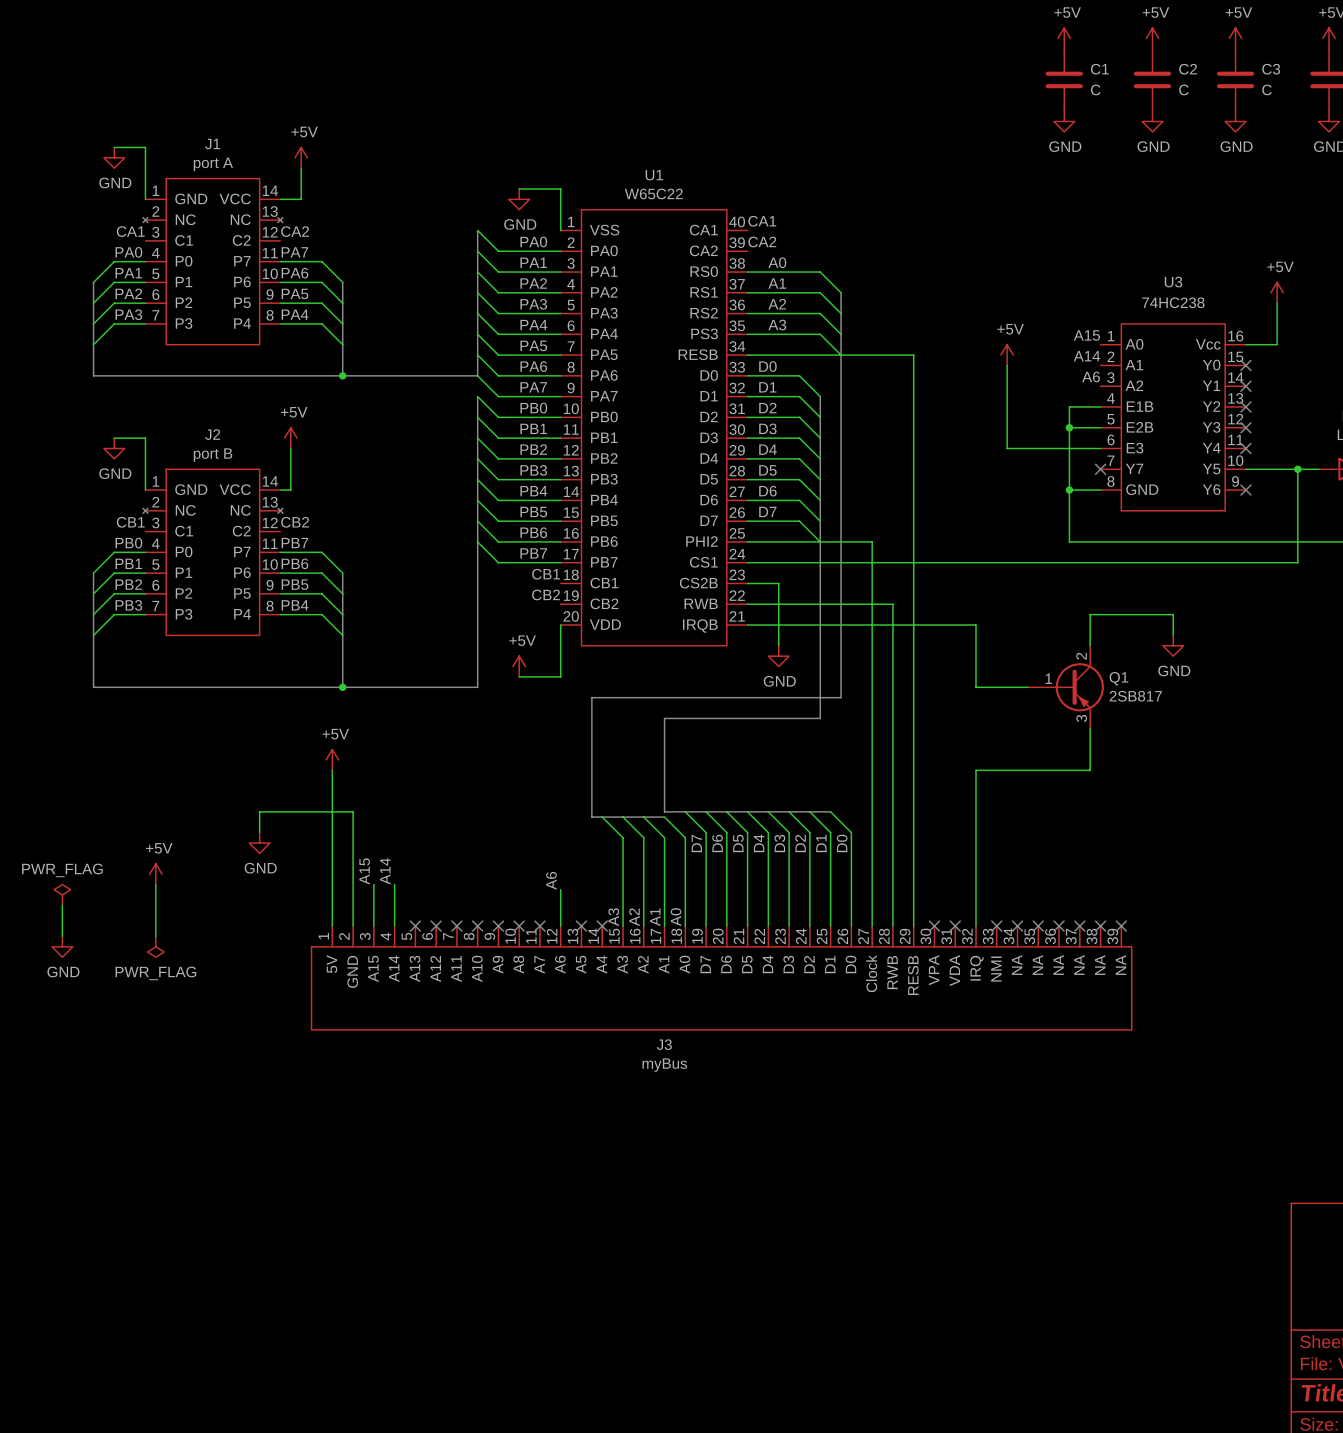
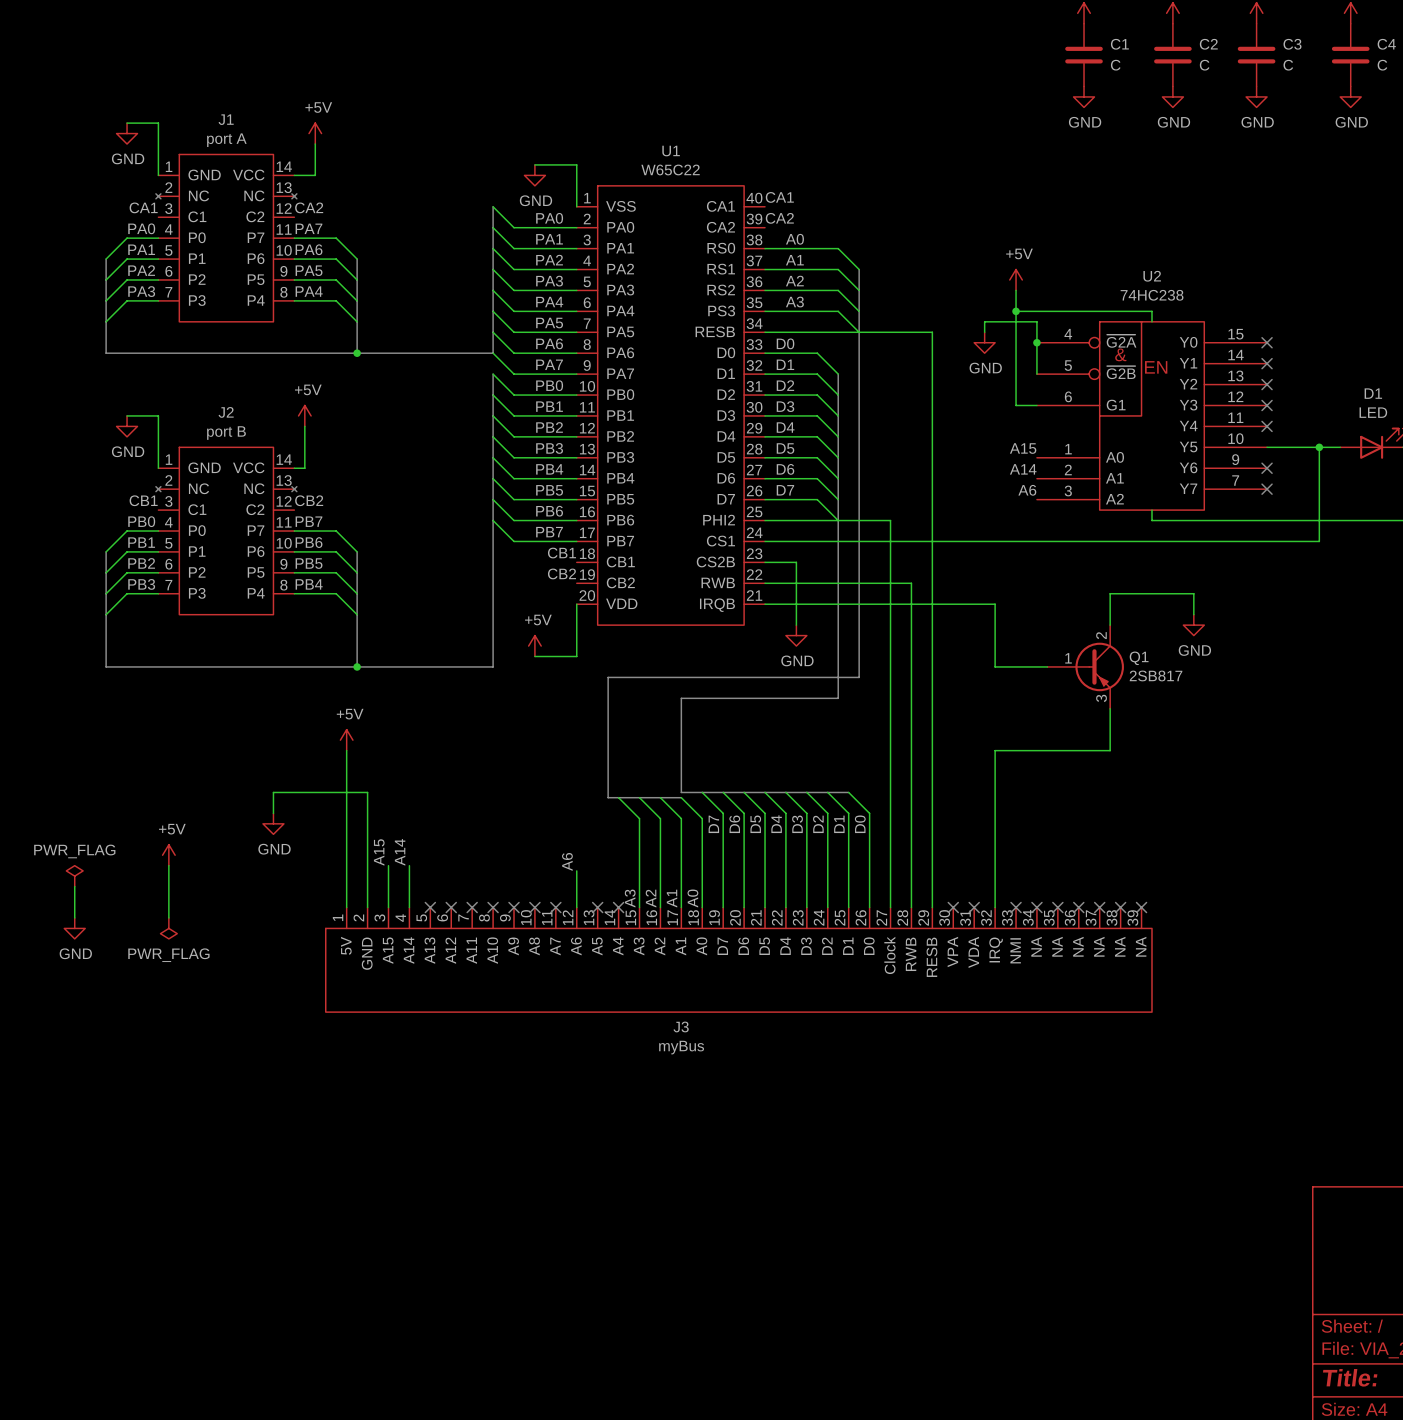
power symbol: +5V (1277, 292) -> none
wire: (1277, 303) (1277, 344) (1245, 344) -> none
wire: none -> (1016, 290) (1016, 405) (1036, 405)
wire: none -> (1016, 311) (1151, 311) (1151, 321)
junction: none -> (1016, 311)
label position: A15 (1086, 335) -> A15 (1023, 448)
wire: none -> (984, 332) (984, 321) (1036, 321) (1036, 374)
power symbol position: +5V (1007, 355) -> +5V (1016, 279)
label position: A14 (1086, 356) -> A14 (1023, 469)
power symbol: none -> GND (984, 342)
wire: (1007, 365) (1007, 448) (1100, 448) -> none
junction: none -> (1036, 342)
label position: A6 (1091, 376) -> A6 (1027, 490)
wire: (1100, 406) (1069, 406) (1069, 541) (1131, 541) -> (1151, 510) (1151, 520)
U3: 74HC238 (1173, 417) -> none
wire: (1069, 427) (1100, 427) -> none
junction: (1069, 427) -> none
U2: none -> 74HC238 (1151, 415)
no-connect mark: (1100, 469) -> none
wire: (1069, 490) (1100, 490) -> none
junction: (1069, 490) -> none
no-connect mark: none -> (1267, 489)

